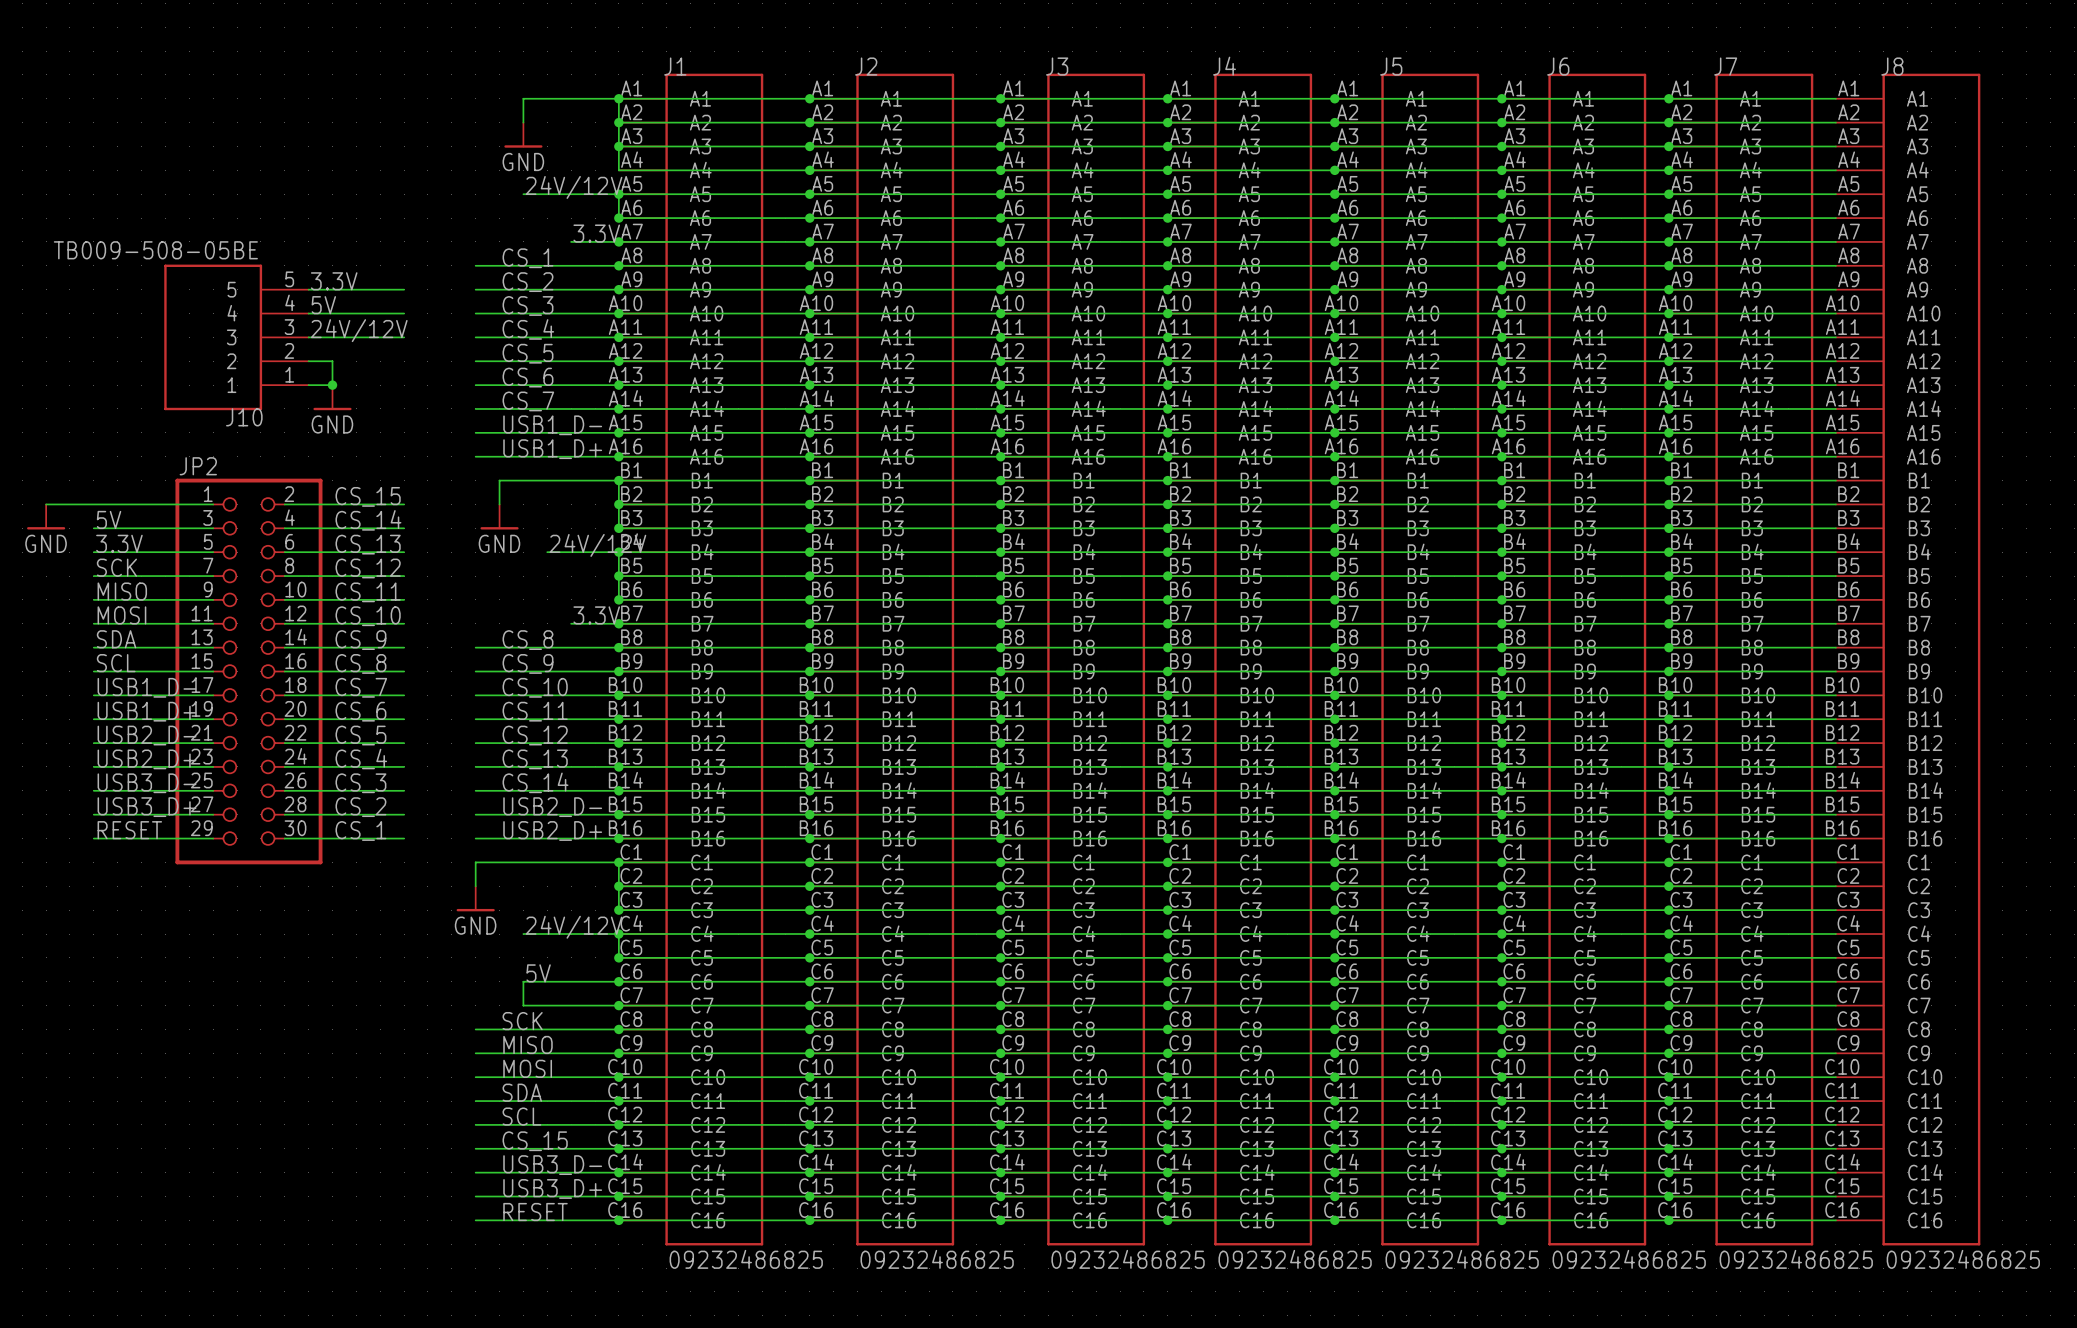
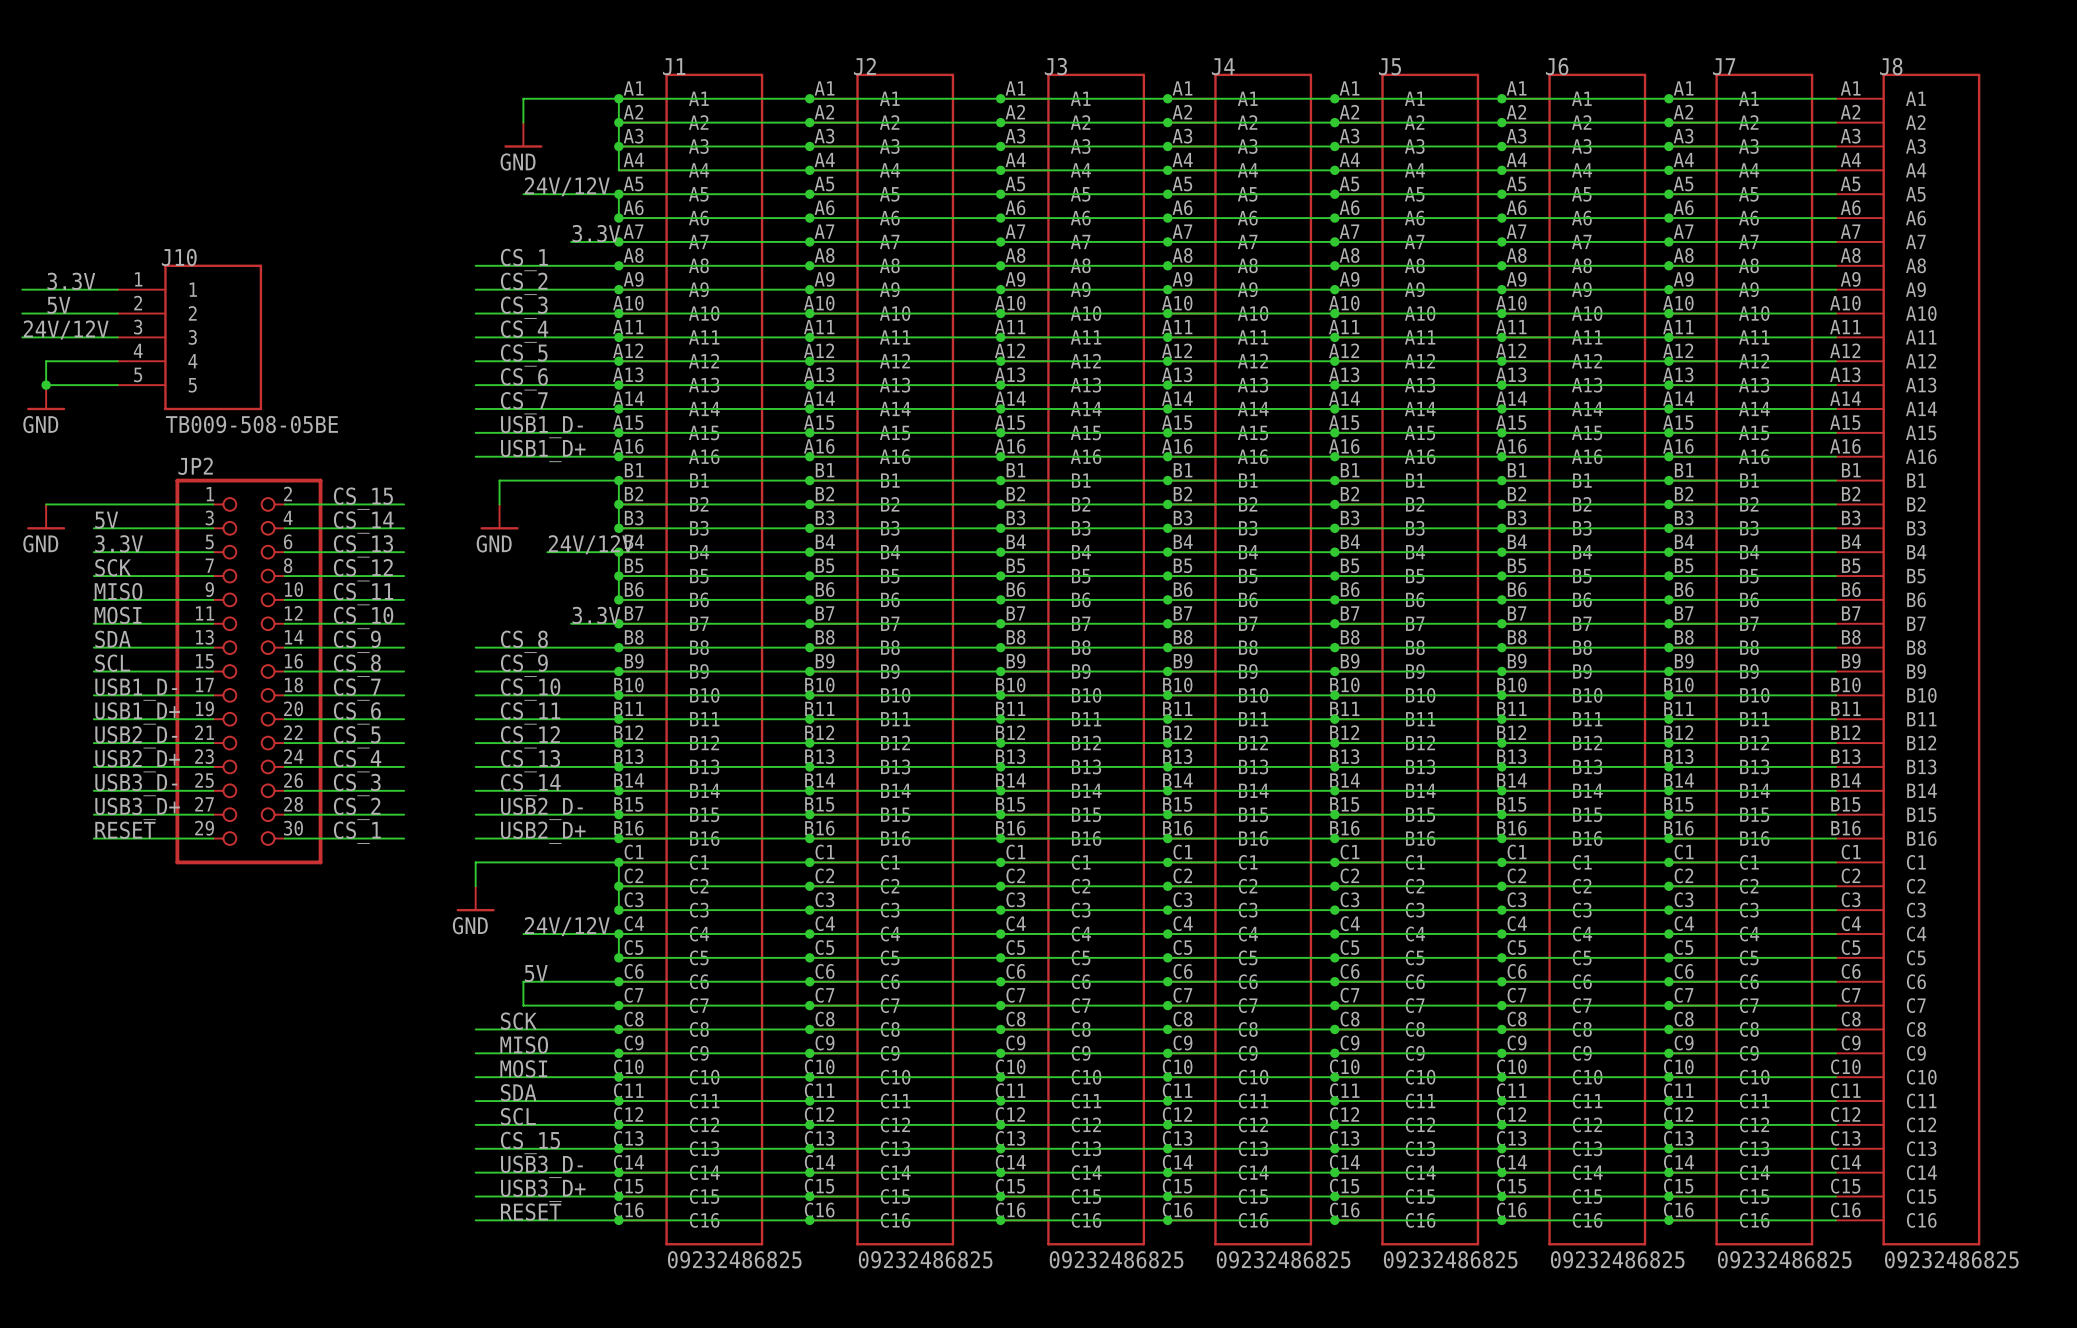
label: none -> 3.3V (71, 281)
label: 3.3V (334, 281) -> none
wire: none -> (22, 289) (117, 289)
wire: (308, 289) (404, 289) -> none
label: none -> 5V (58, 305)
label: 5V (323, 305) -> none
wire: none -> (22, 313) (117, 313)
wire: (308, 313) (404, 313) -> none
label: none -> 24V/12V (66, 329)
label: 24V/12V (359, 330) -> none
wire: none -> (22, 337) (117, 337)
J10 rotation: 0° (213, 337) -> 180° (213, 337)
wire: (308, 337) (404, 337) -> none
wire: none -> (117, 361) (46, 361) (46, 385) (117, 385)
wire: (308, 361) (332, 361) (332, 385) (308, 385) -> none
junction: none -> (46, 385)
junction: (332, 385) -> none
power symbol: none -> GND (46, 397)
power symbol: GND (332, 397) -> none

